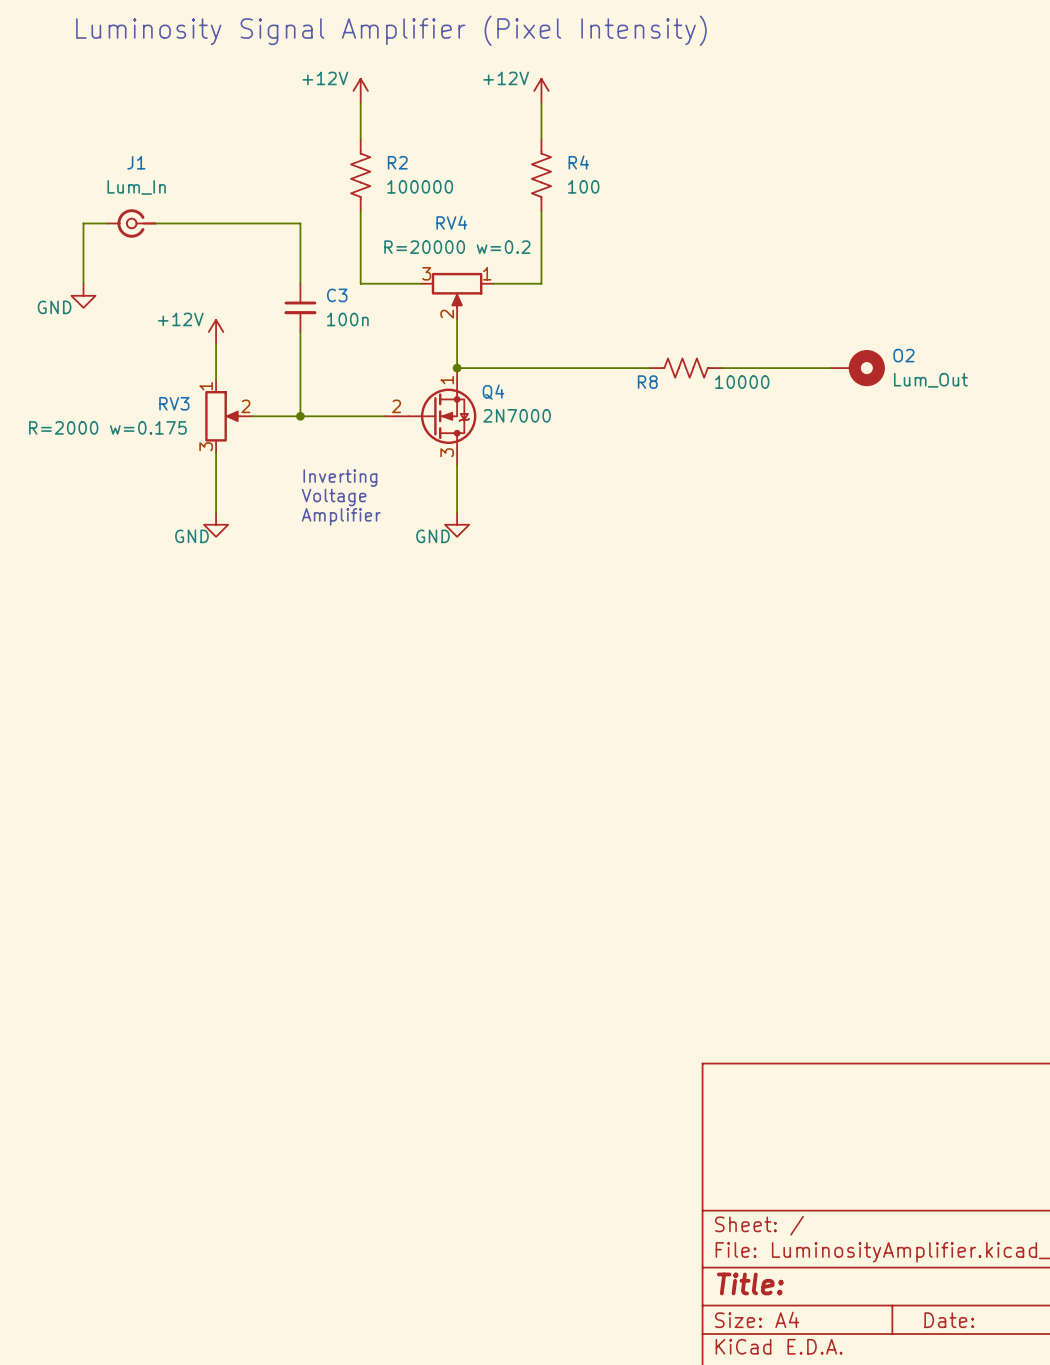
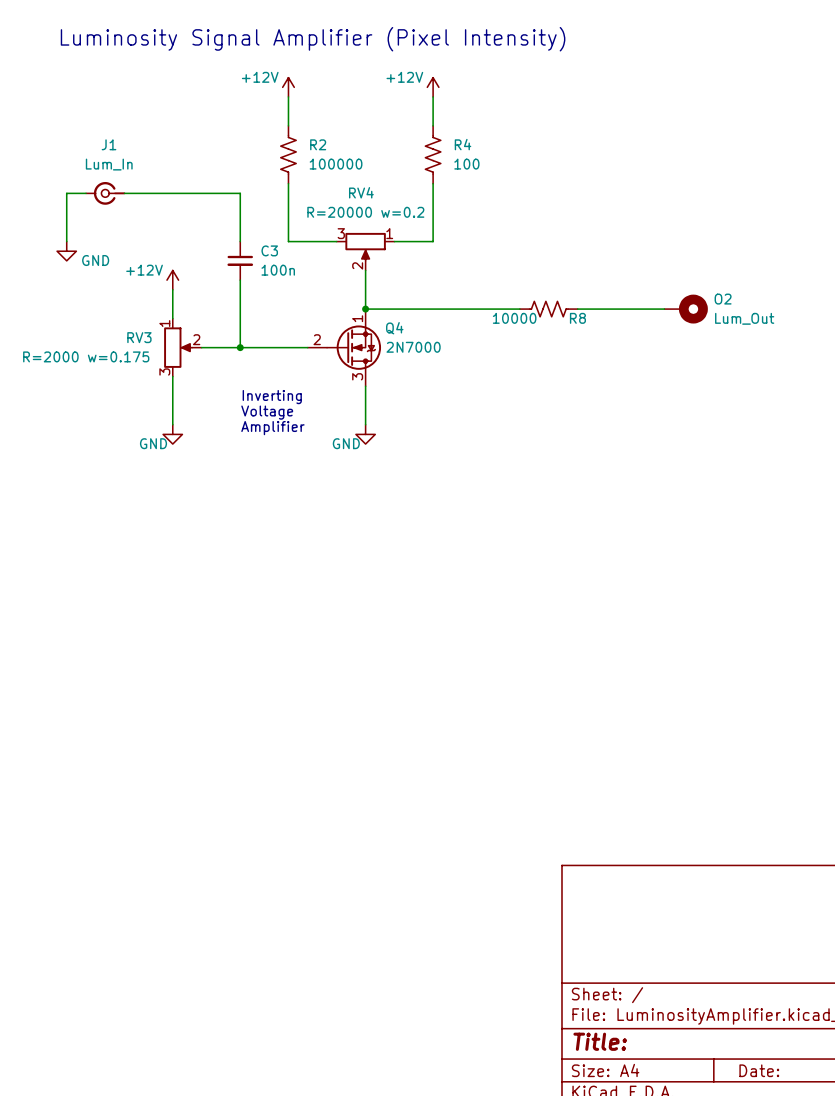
power symbol text position: GND (54, 307) -> GND (95, 260)
R8 name position: R8 (647, 382) -> R8 (577, 318)
R8 value position: 10000 (742, 382) -> 10000 (514, 318)

